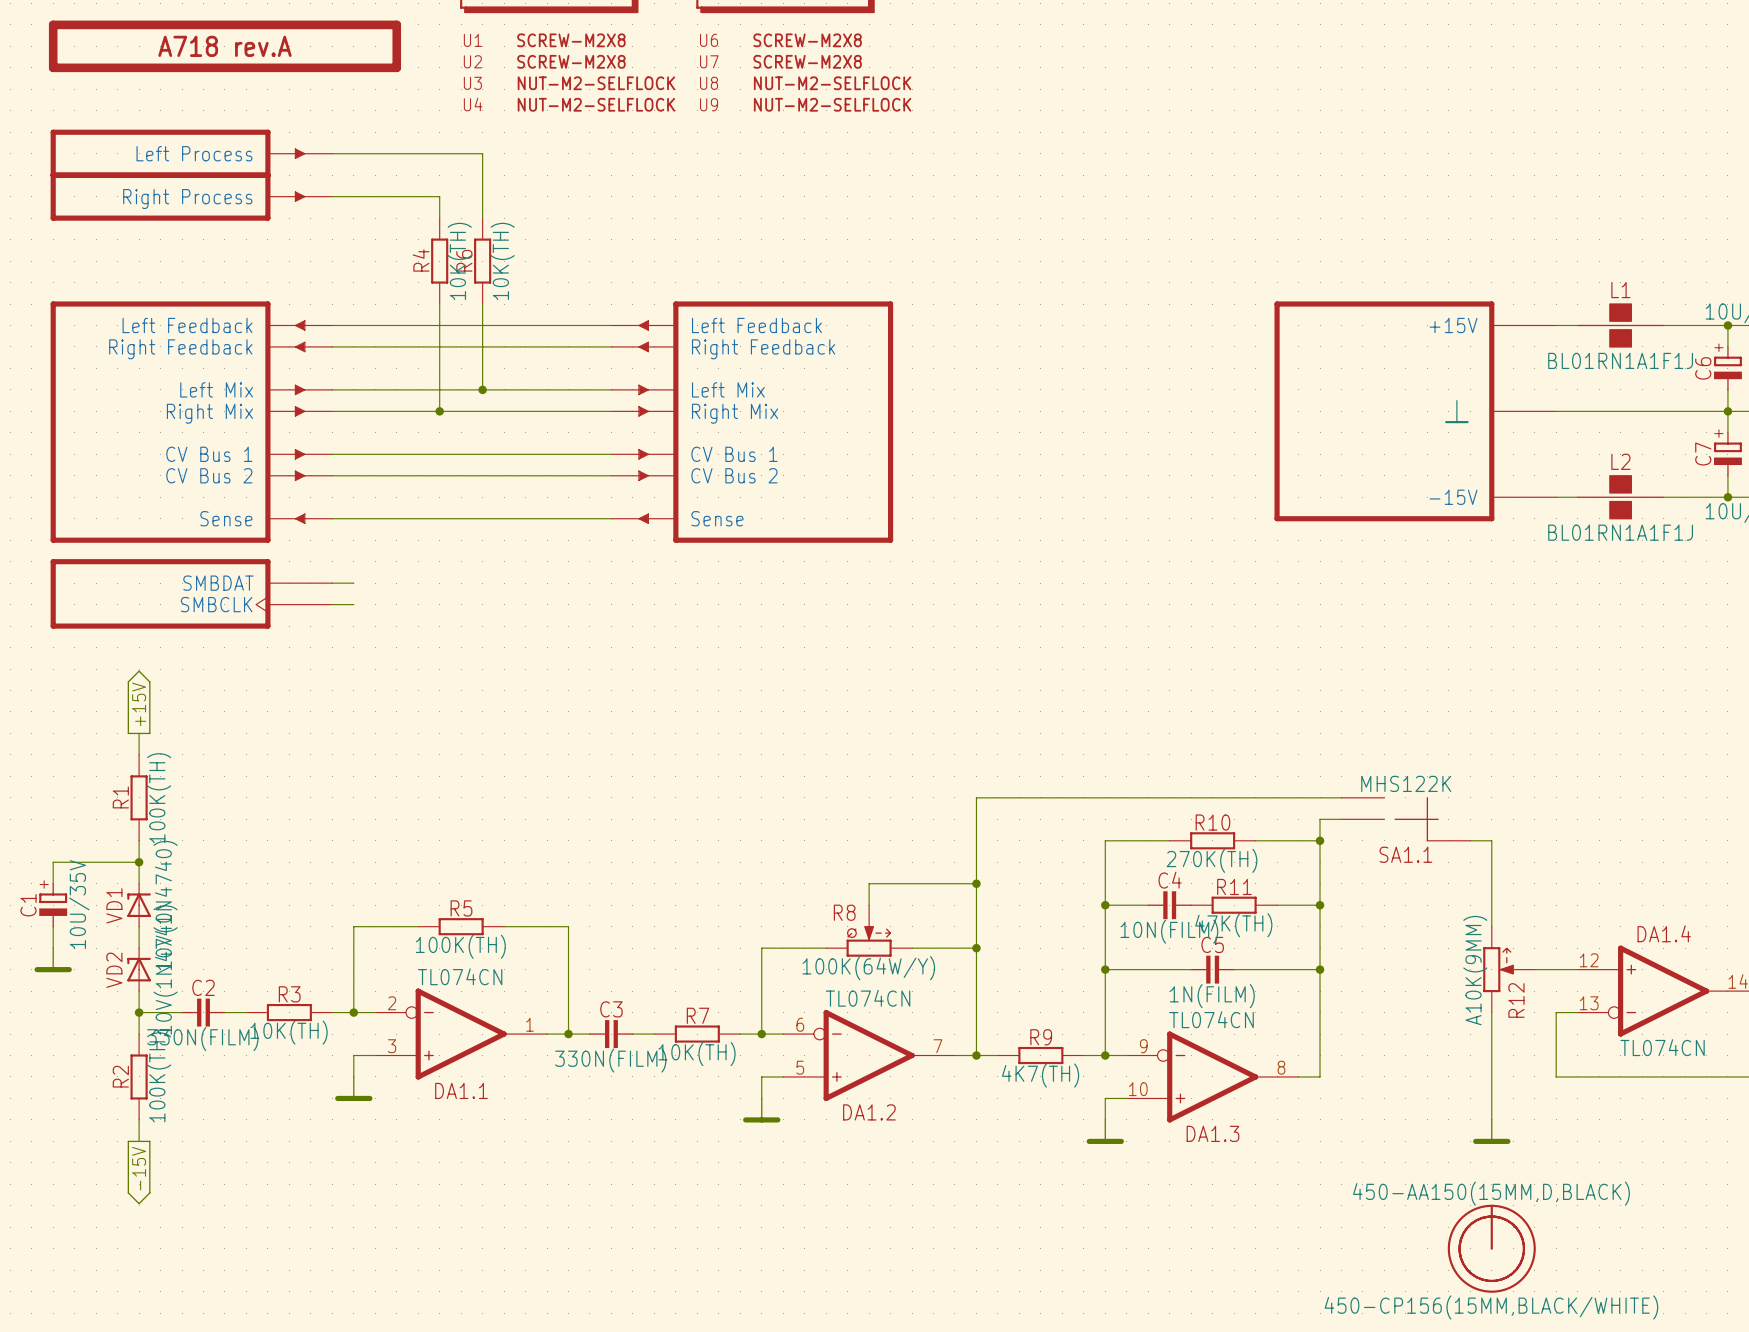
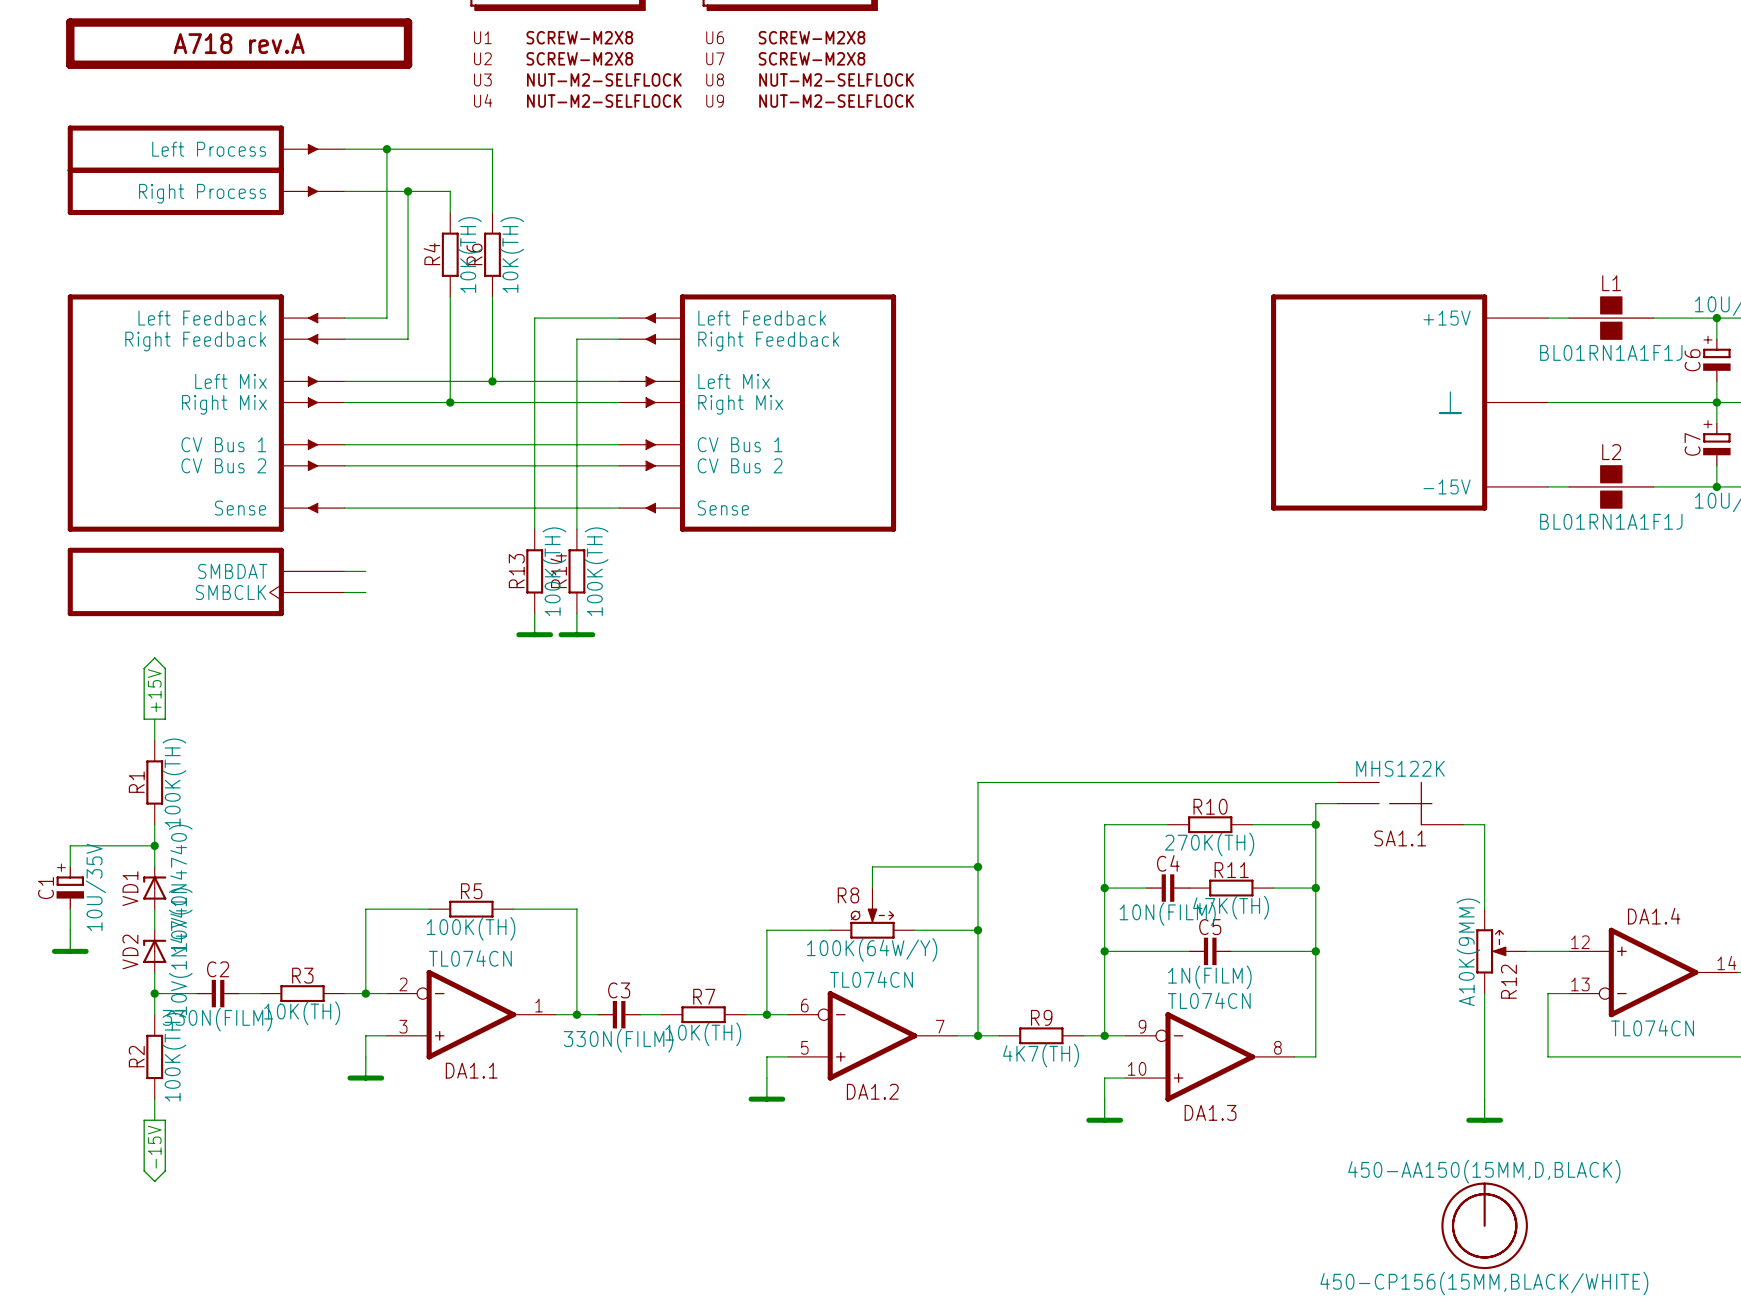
junction: none -> (386, 149)
junction: none -> (408, 191)
wire: (375, 325) (525, 325) -> (386, 318) (386, 149)
wire: none -> (534, 318) (534, 529)
wire: (396, 346) (568, 346) -> (408, 339) (408, 191)
wire: none -> (576, 339) (576, 529)
R13: none -> 100K(TH) (534, 571)
R14: none -> 100K(TH) (576, 571)
power symbol: none -> (534, 625)
power symbol: none -> (576, 625)

